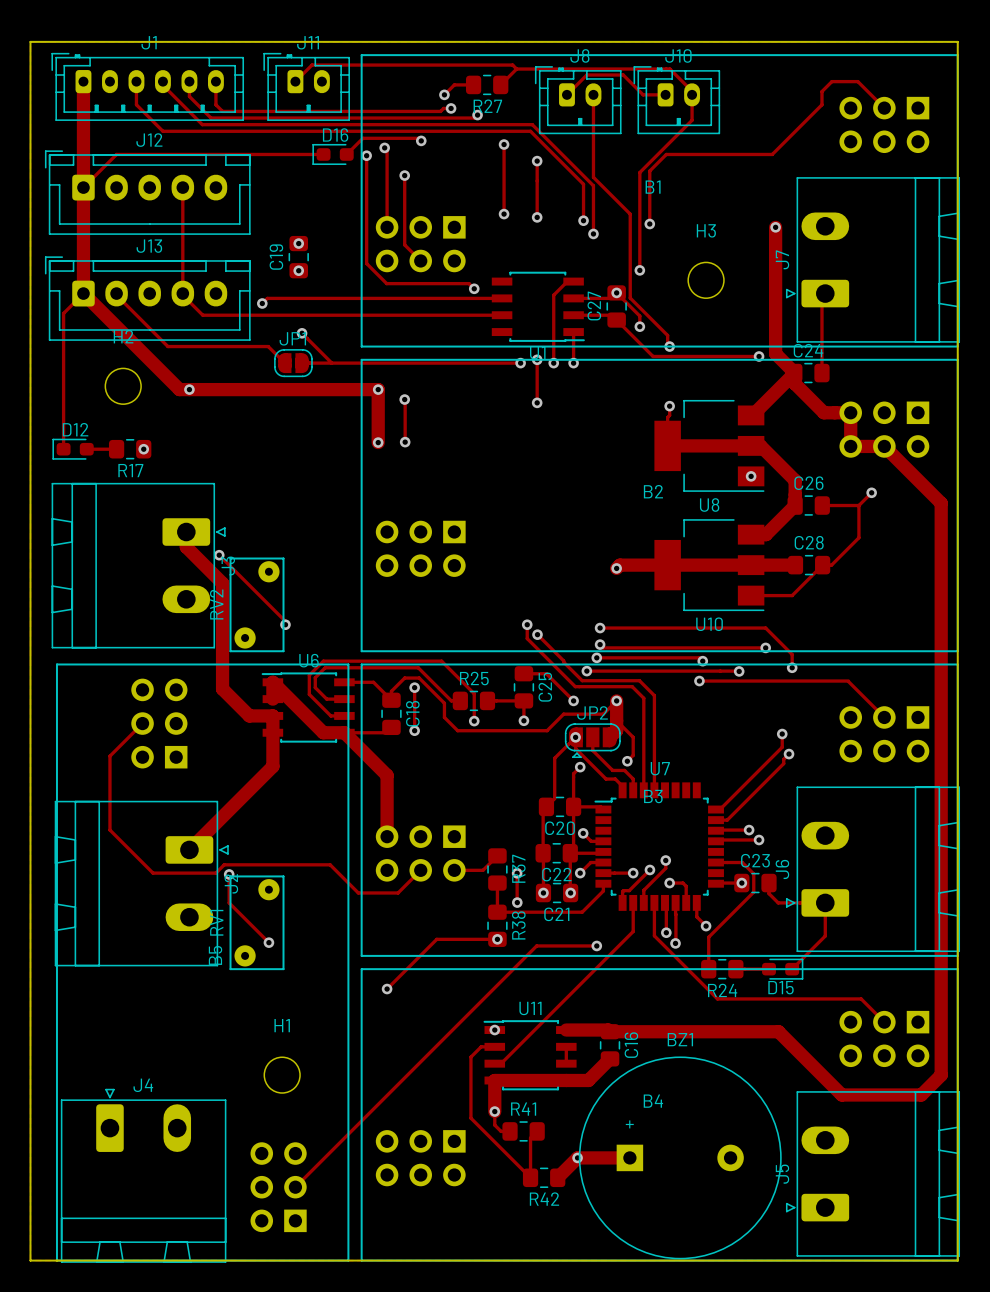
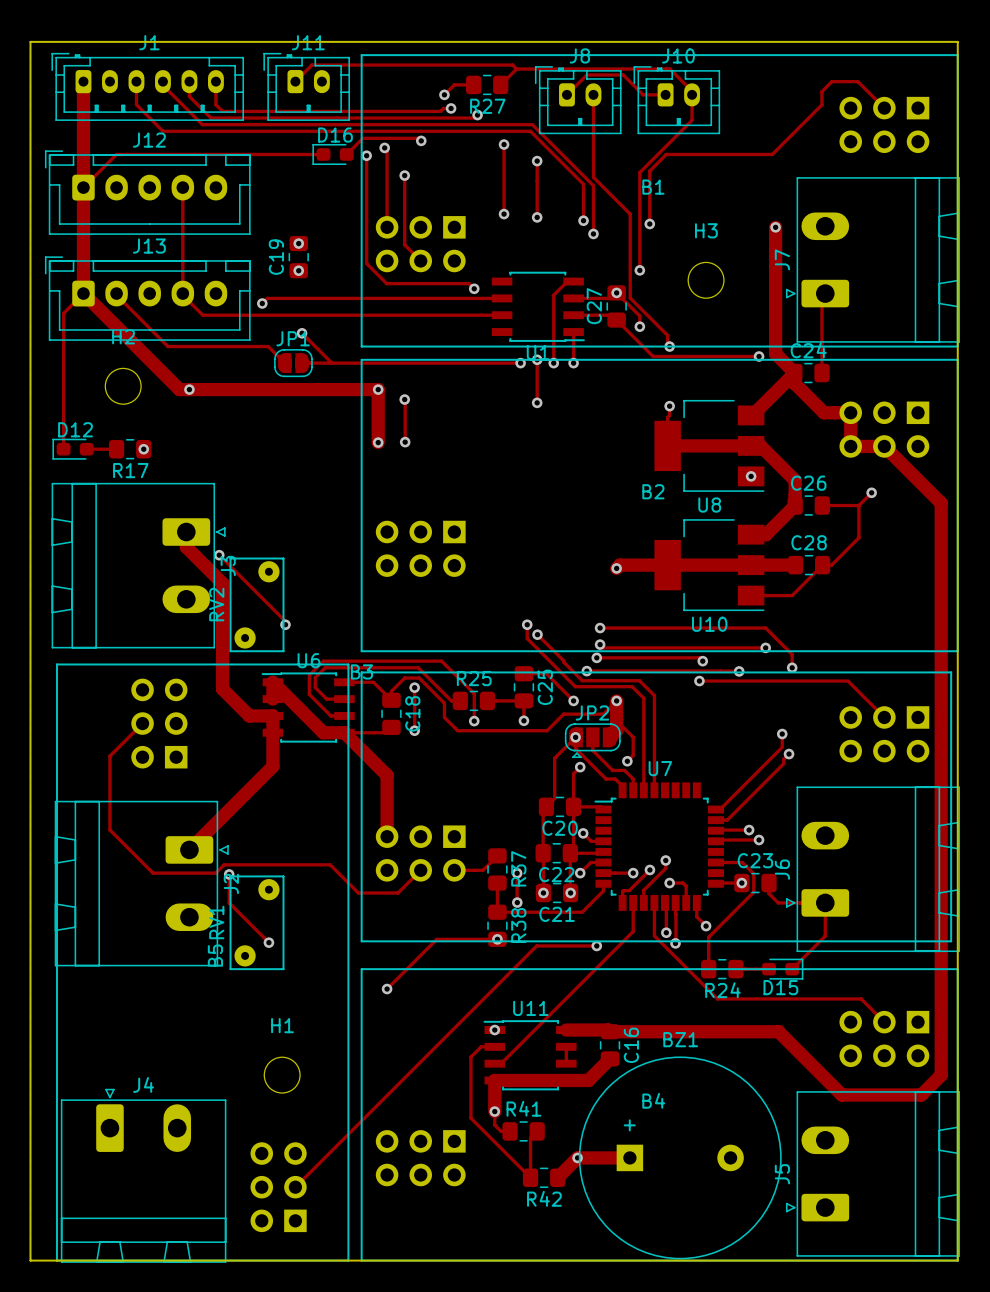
B3 footprint: [360, 663, 959, 957] -> [360, 671, 953, 943]
B3 name position: B3 (653, 796) -> B3 (361, 671)

